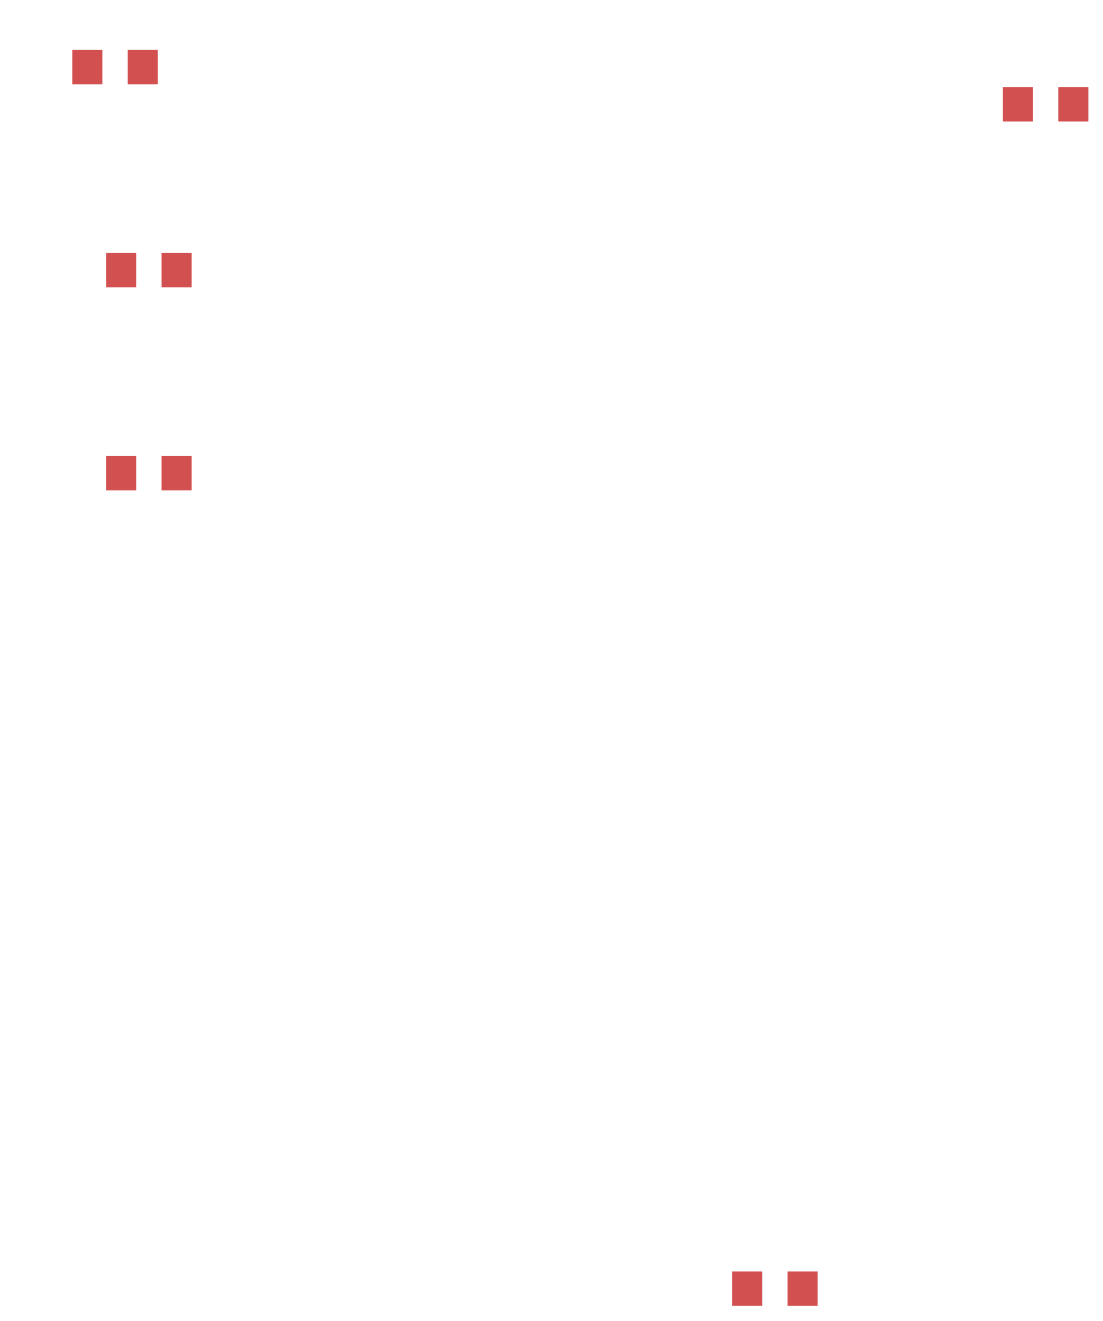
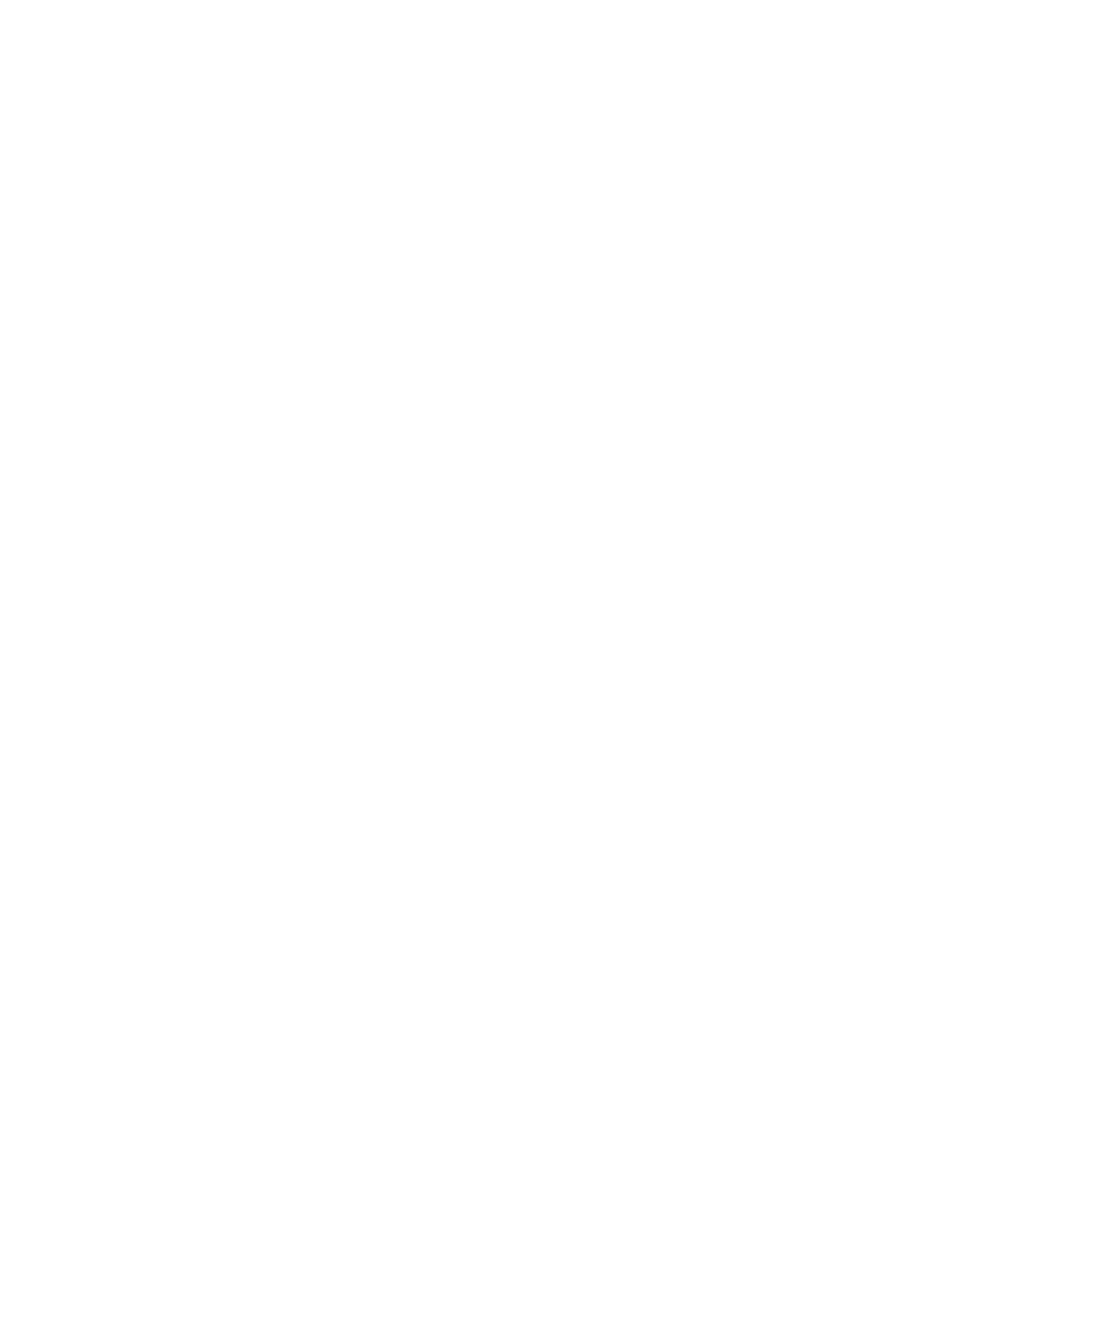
part: (115, 67) -> none
part: (1045, 104) -> none
part: (148, 270) -> none
part: (148, 473) -> none
part: (774, 1288) -> none

